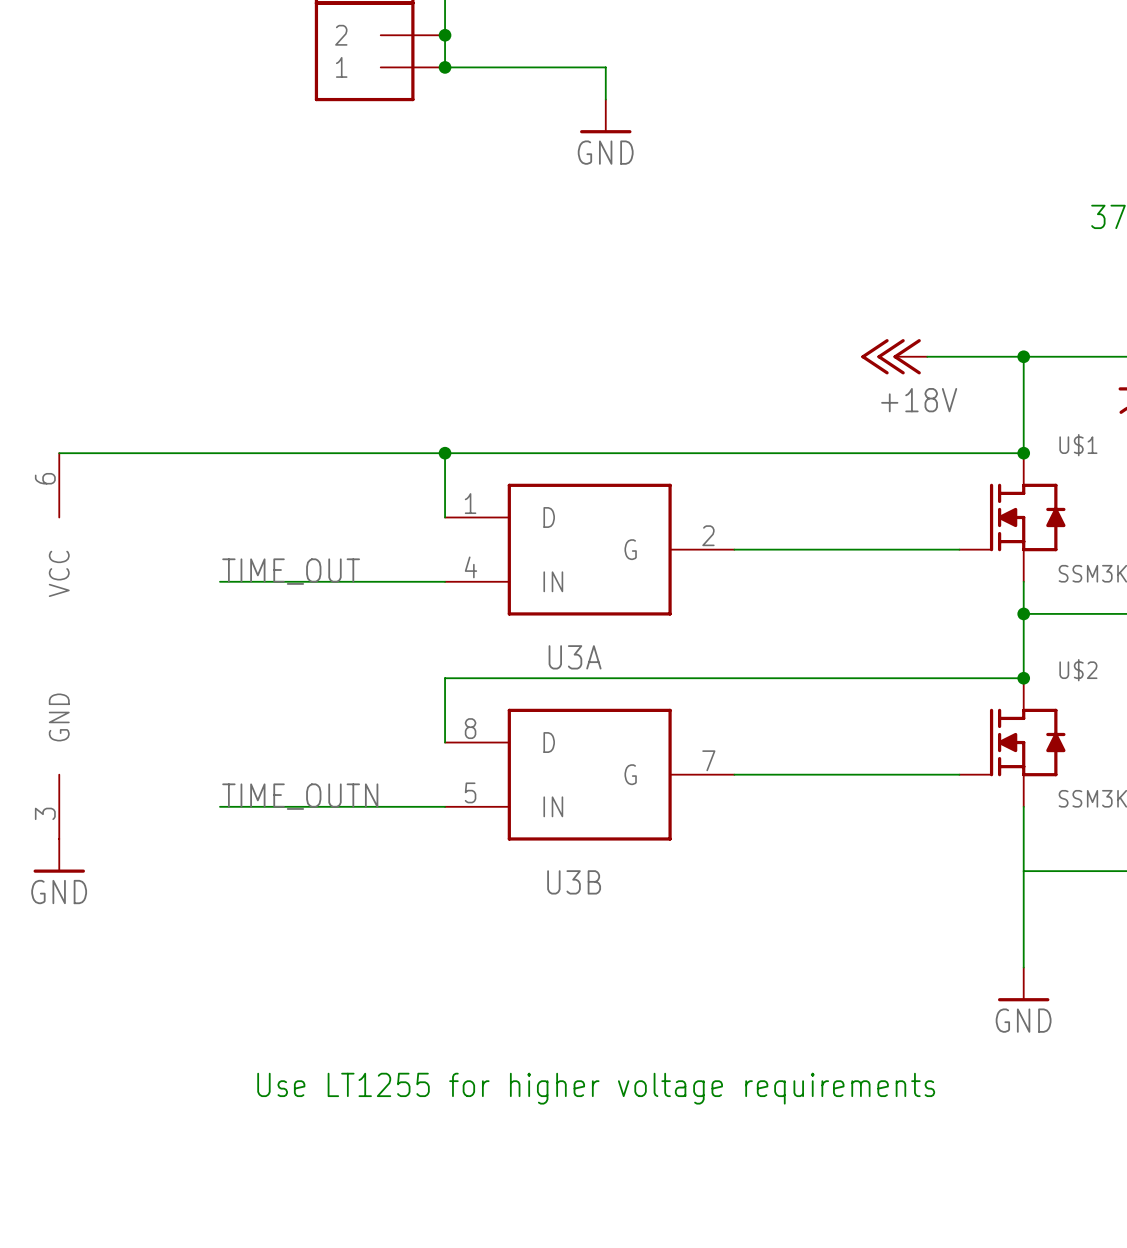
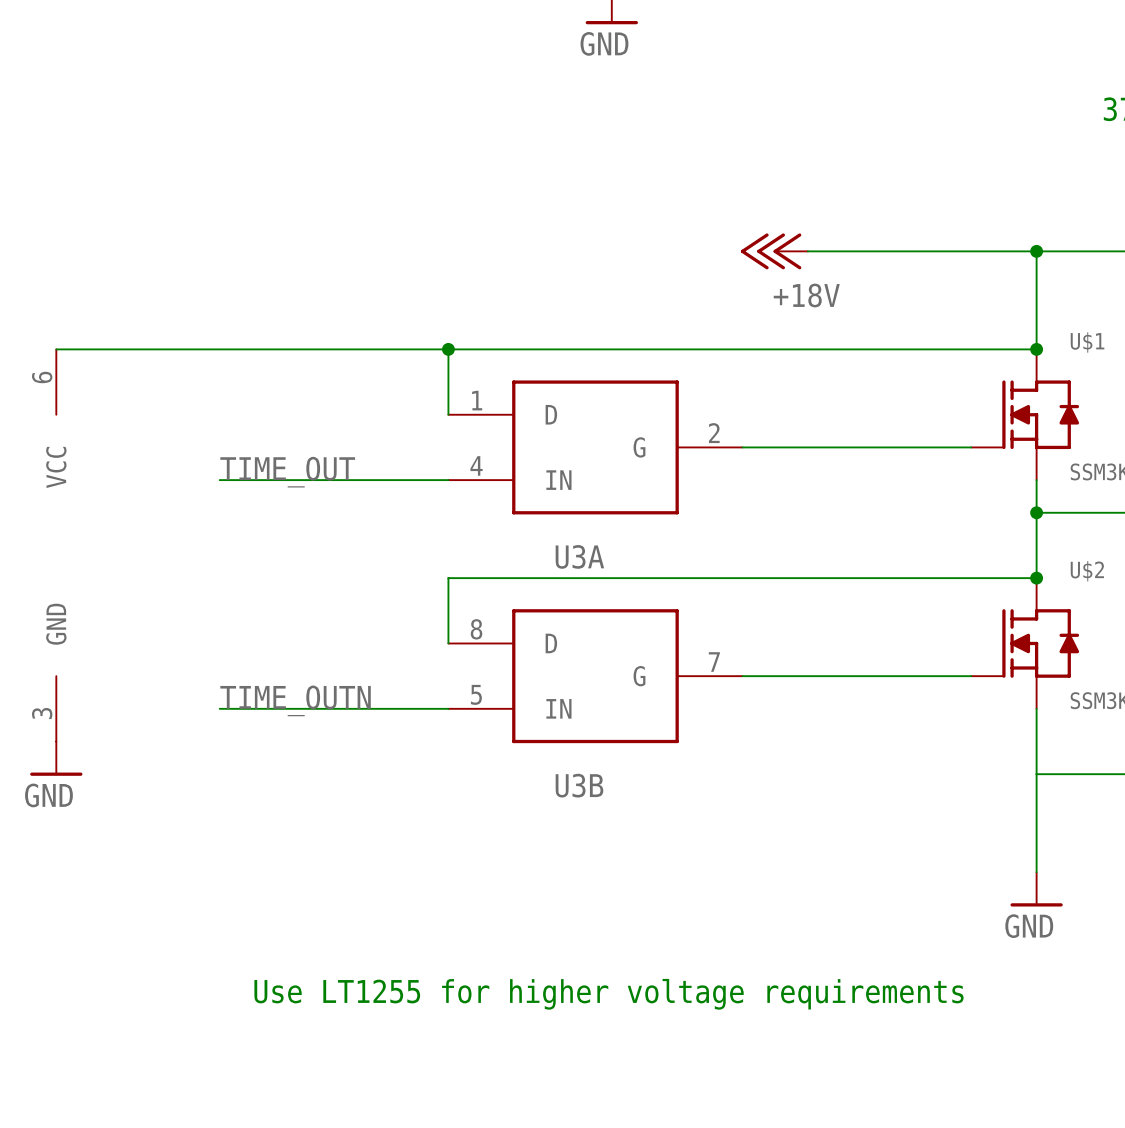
wire: none -> (807, 251) (938, 251)
power symbol position: +18V (894, 356) -> +18V (774, 251)

